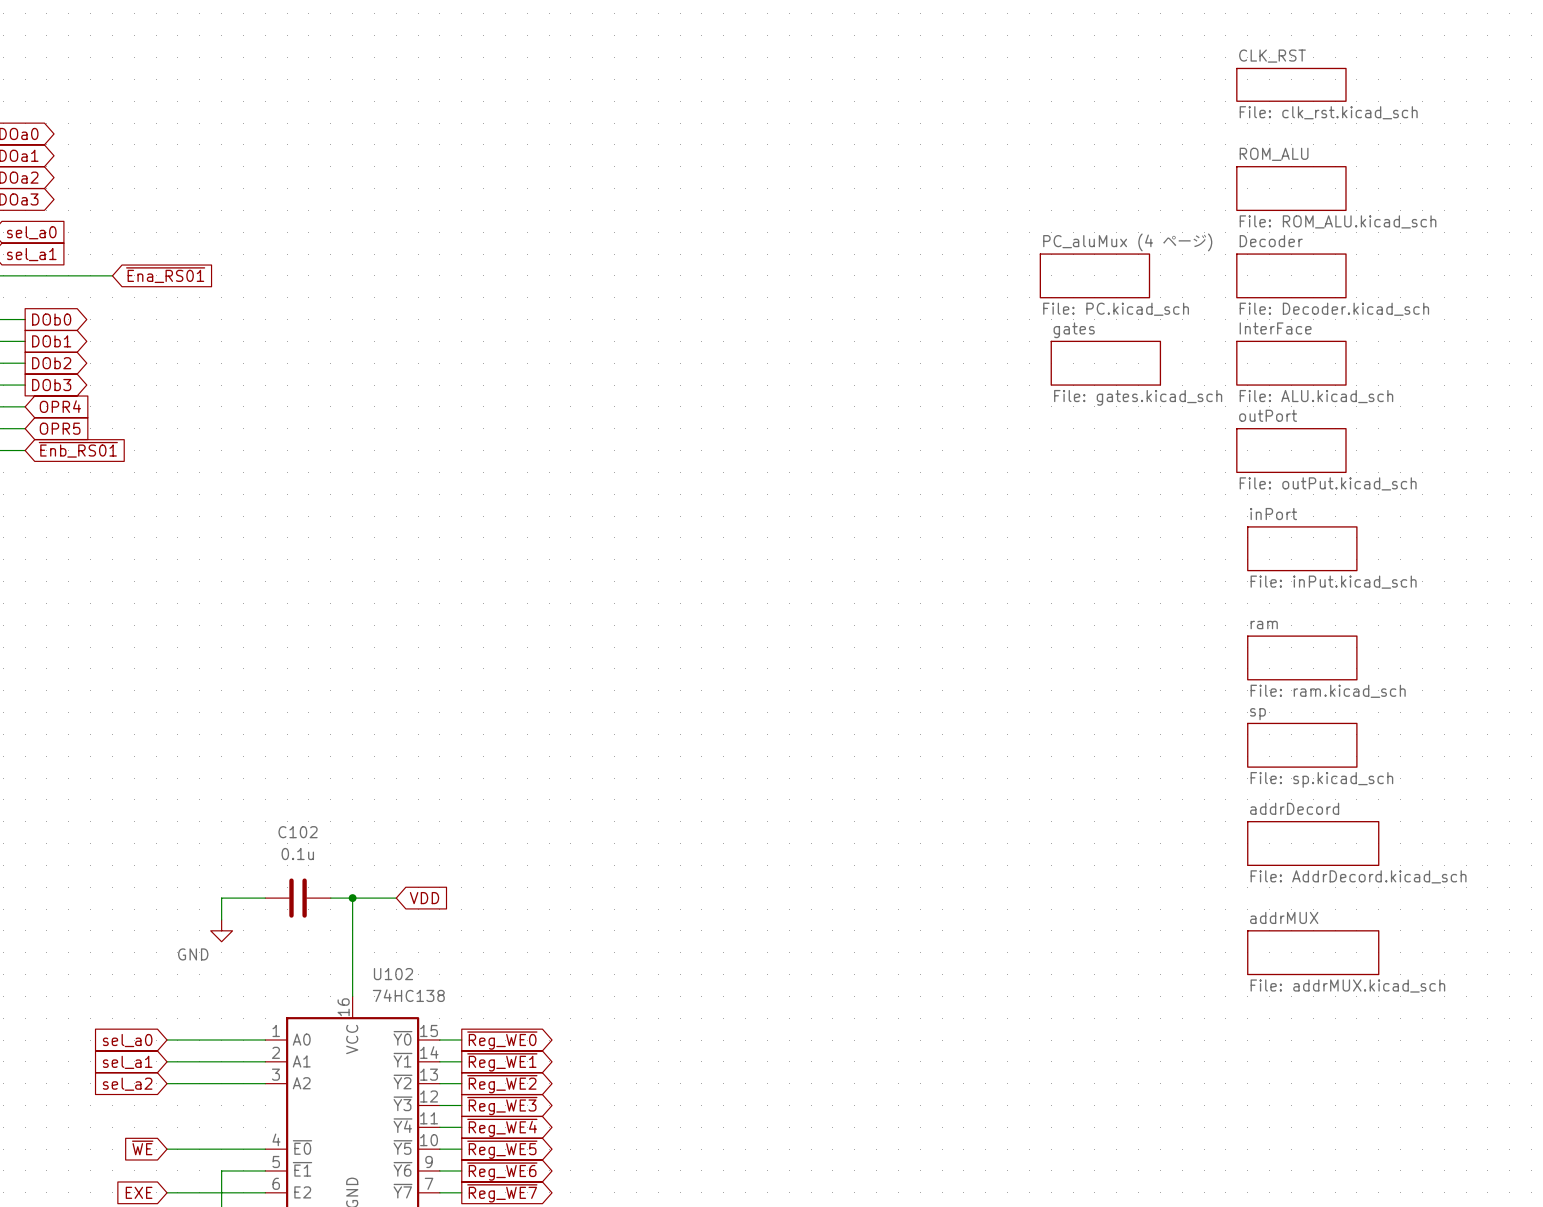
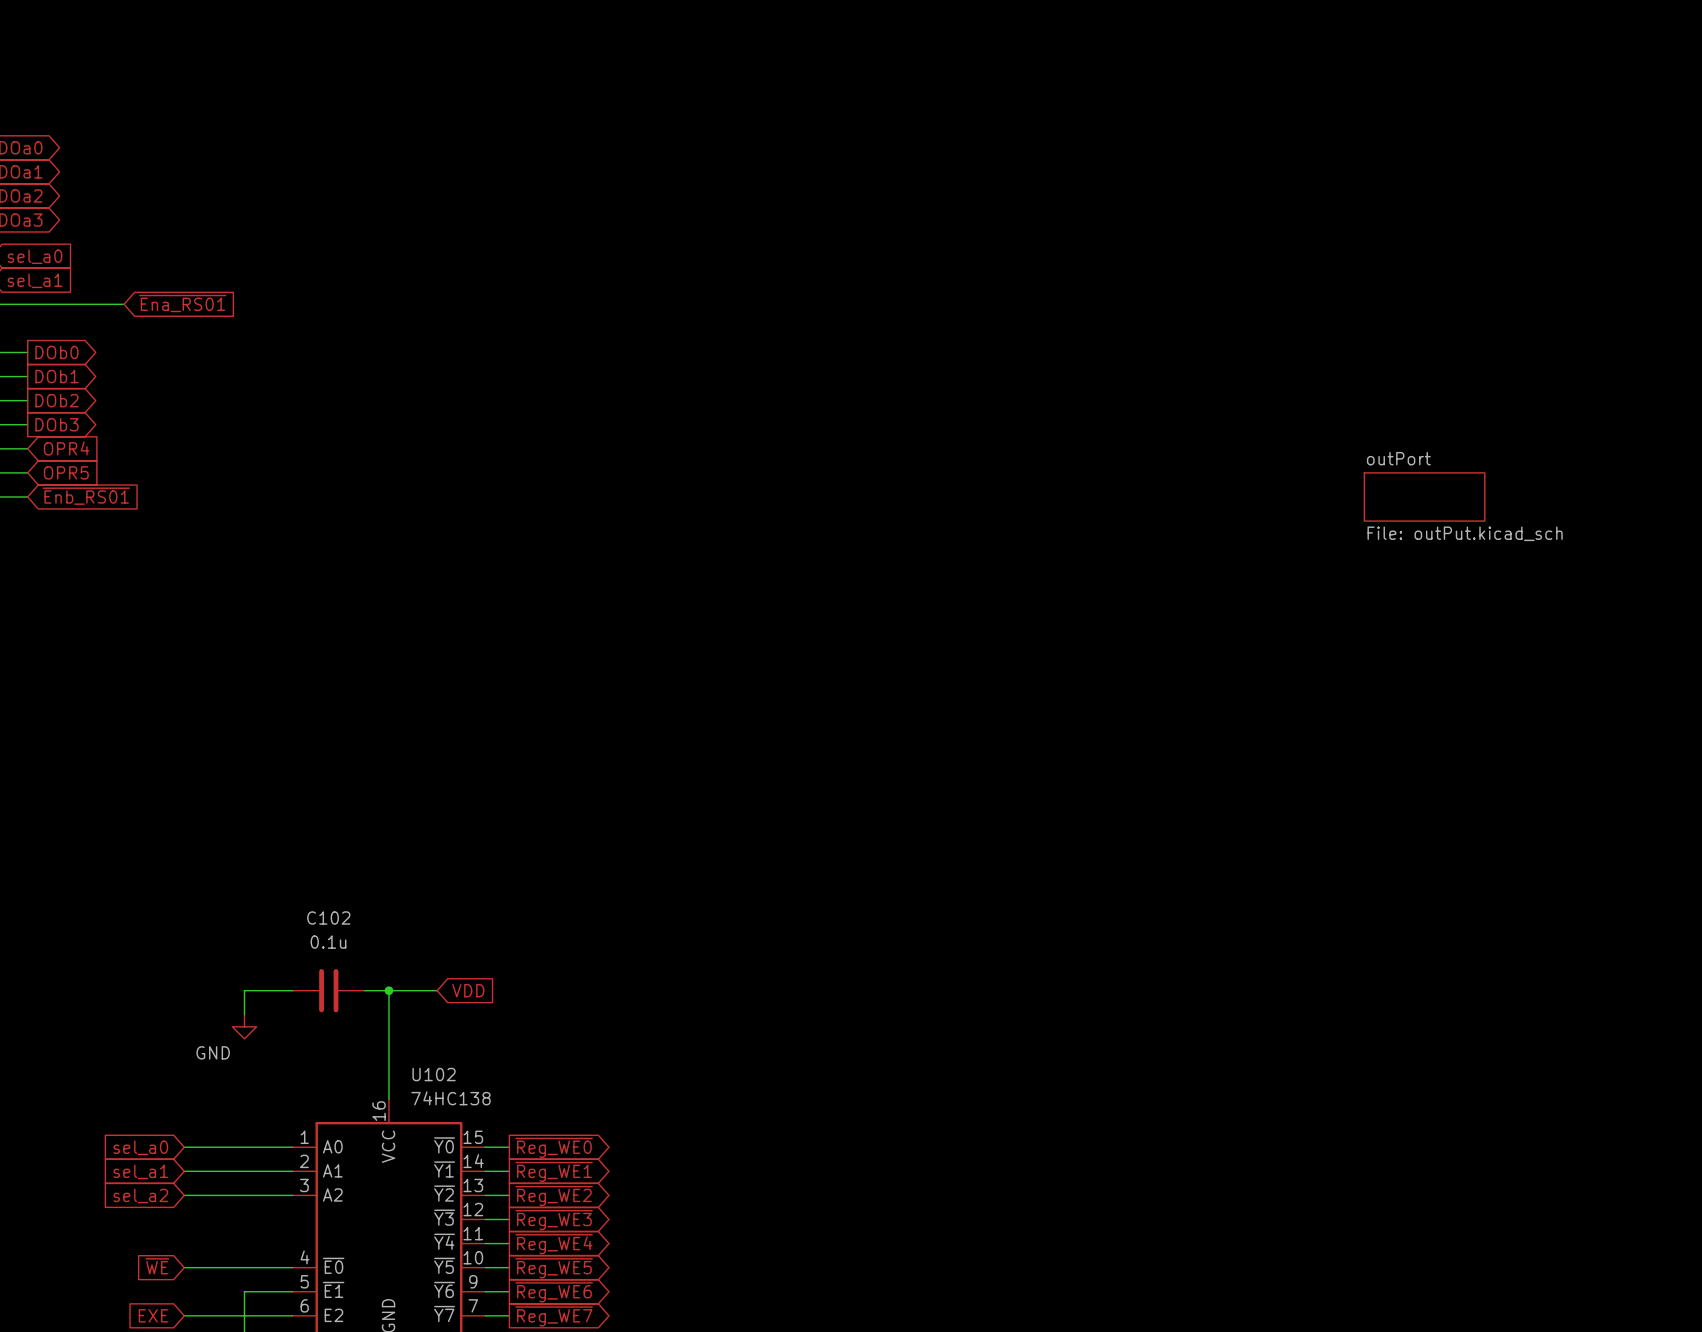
sheet CLK_RST: File: clk_rst.kicad_sch (1291, 84) -> none
sheet ROM_ALU: File: ROM_ALU.kicad_sch (1291, 188) -> none
sheet PC_aluMux (4 ページ): File: PC.kicad_sch (1094, 275) -> none
sheet Decoder: File: Decoder.kicad_sch (1291, 275) -> none
sheet gates: File: gates.kicad_sch (1105, 363) -> none
sheet InterFace: File: ALU.kicad_sch (1291, 363) -> none
sheet inPort: File: inPut.kicad_sch (1302, 548) -> none
sheet ram: File: ram.kicad_sch (1302, 657) -> none
sheet sp: File: sp.kicad_sch (1302, 745) -> none
sheet addrDecord: File: AddrDecord.kicad_sch (1313, 843) -> none
sheet addrMUX: File: addrMUX.kicad_sch (1313, 952) -> none

